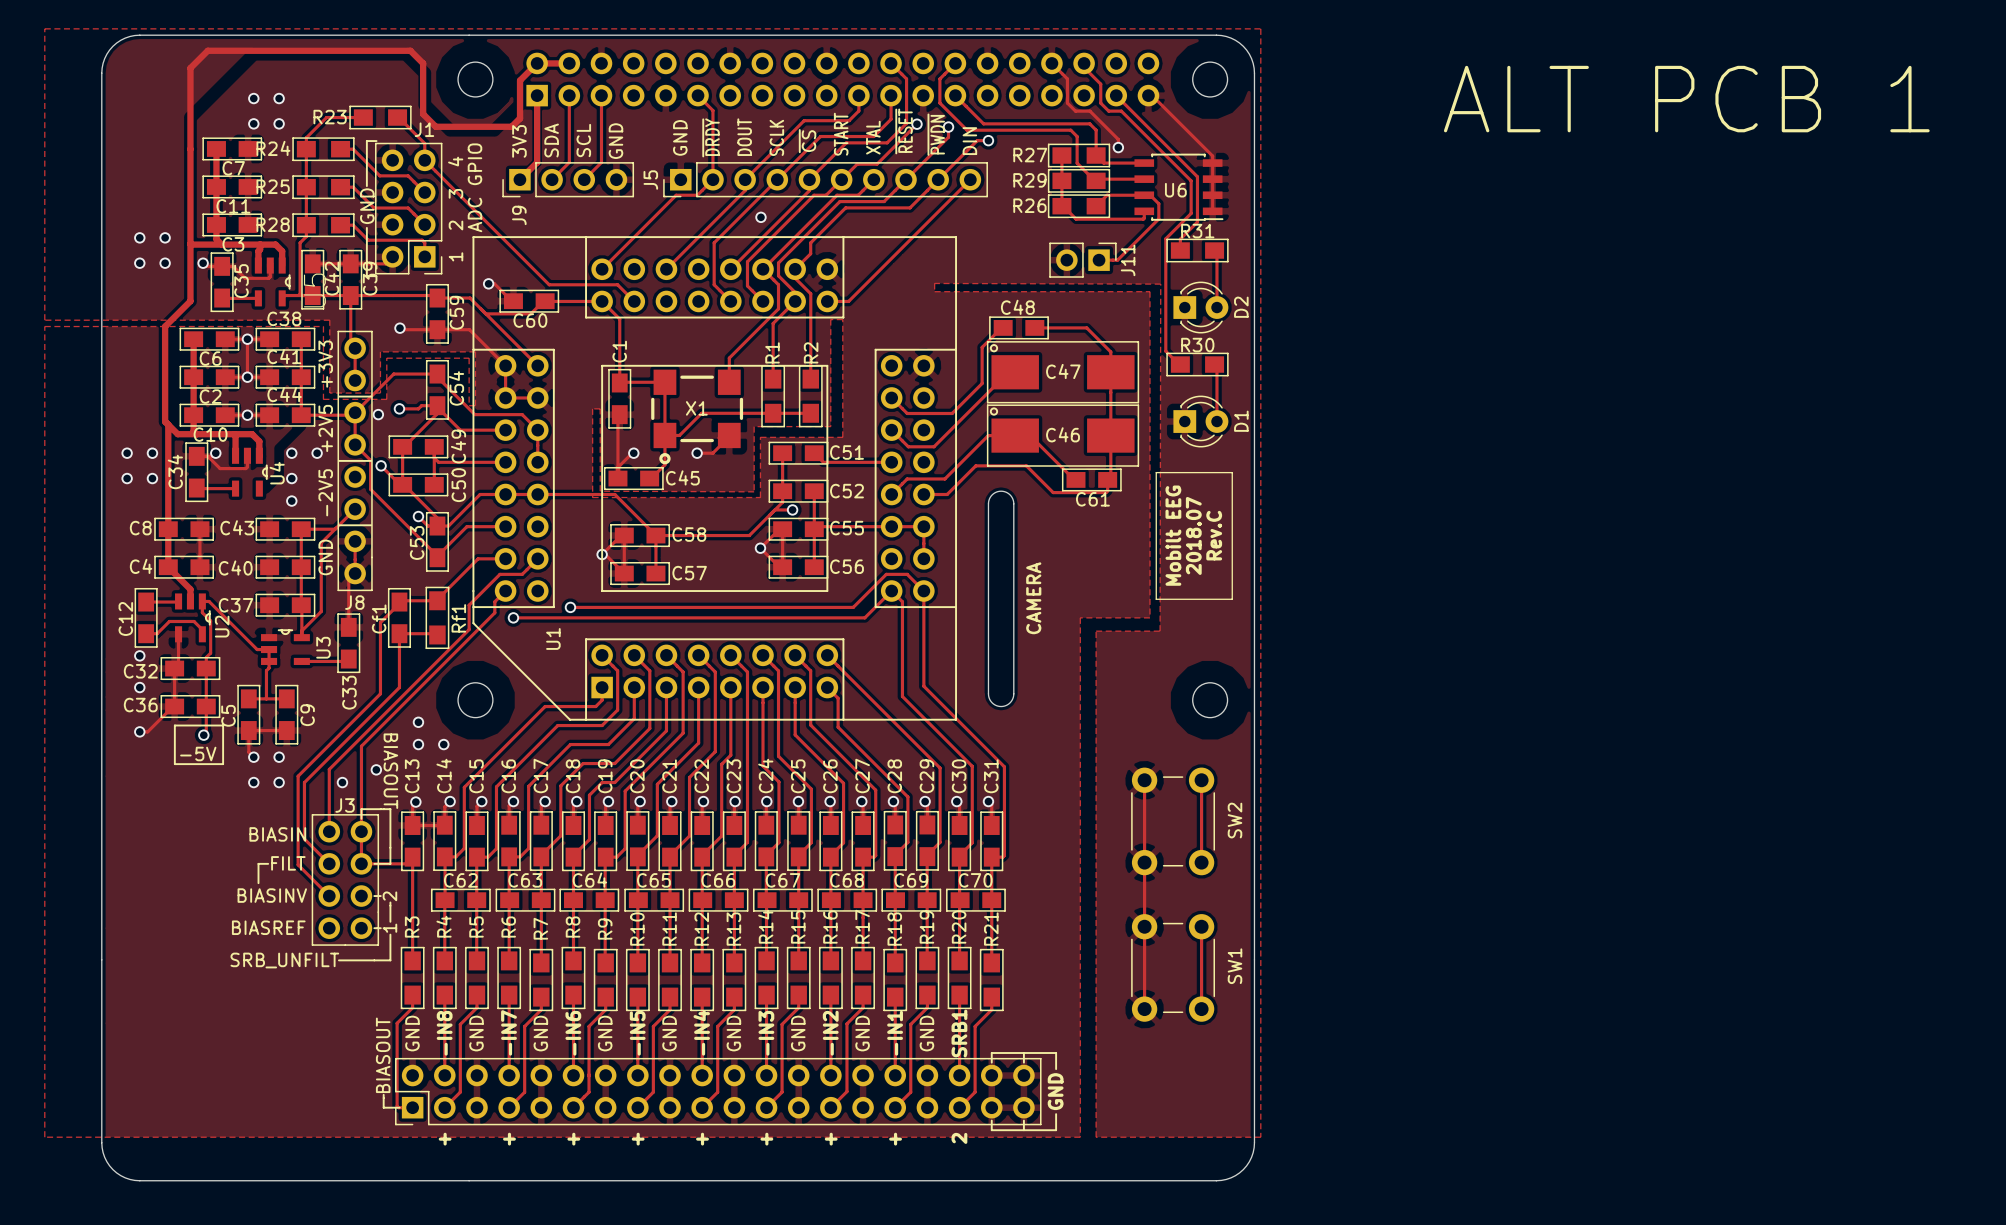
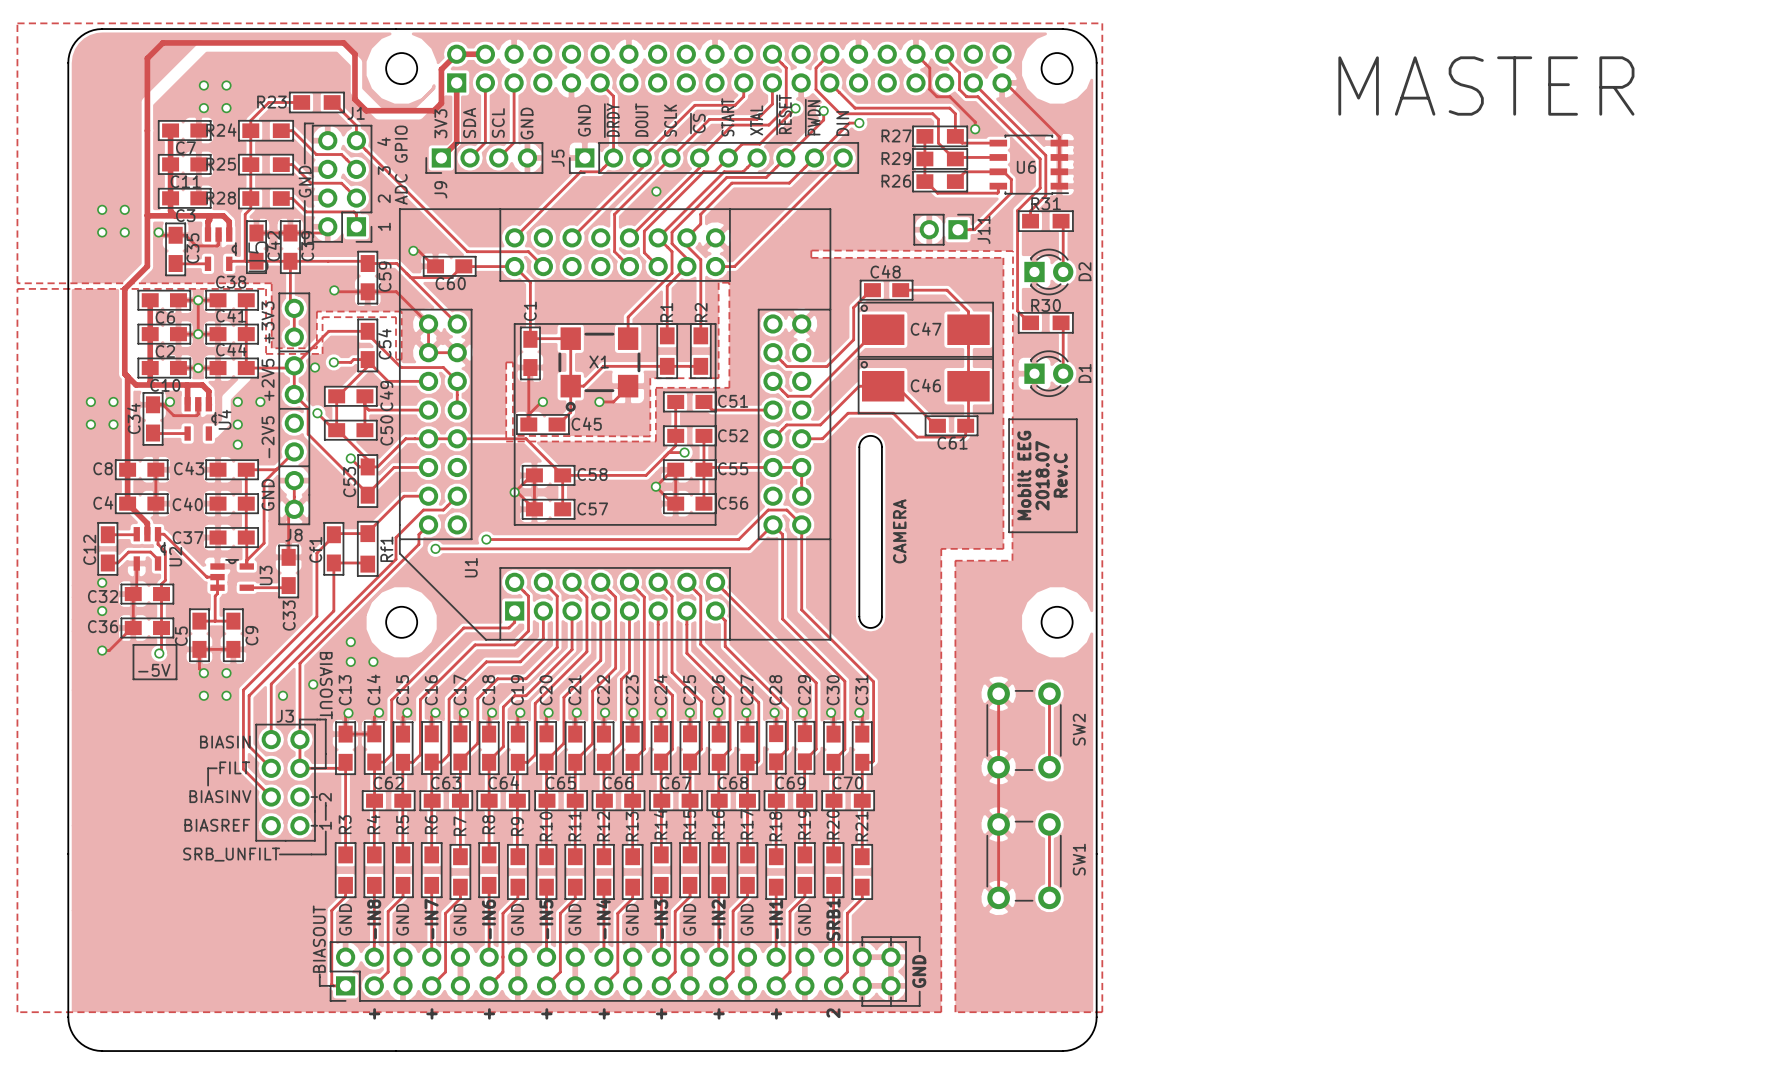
text: ALT PCB 1 (1686, 99) -> MASTER (1486, 86)

